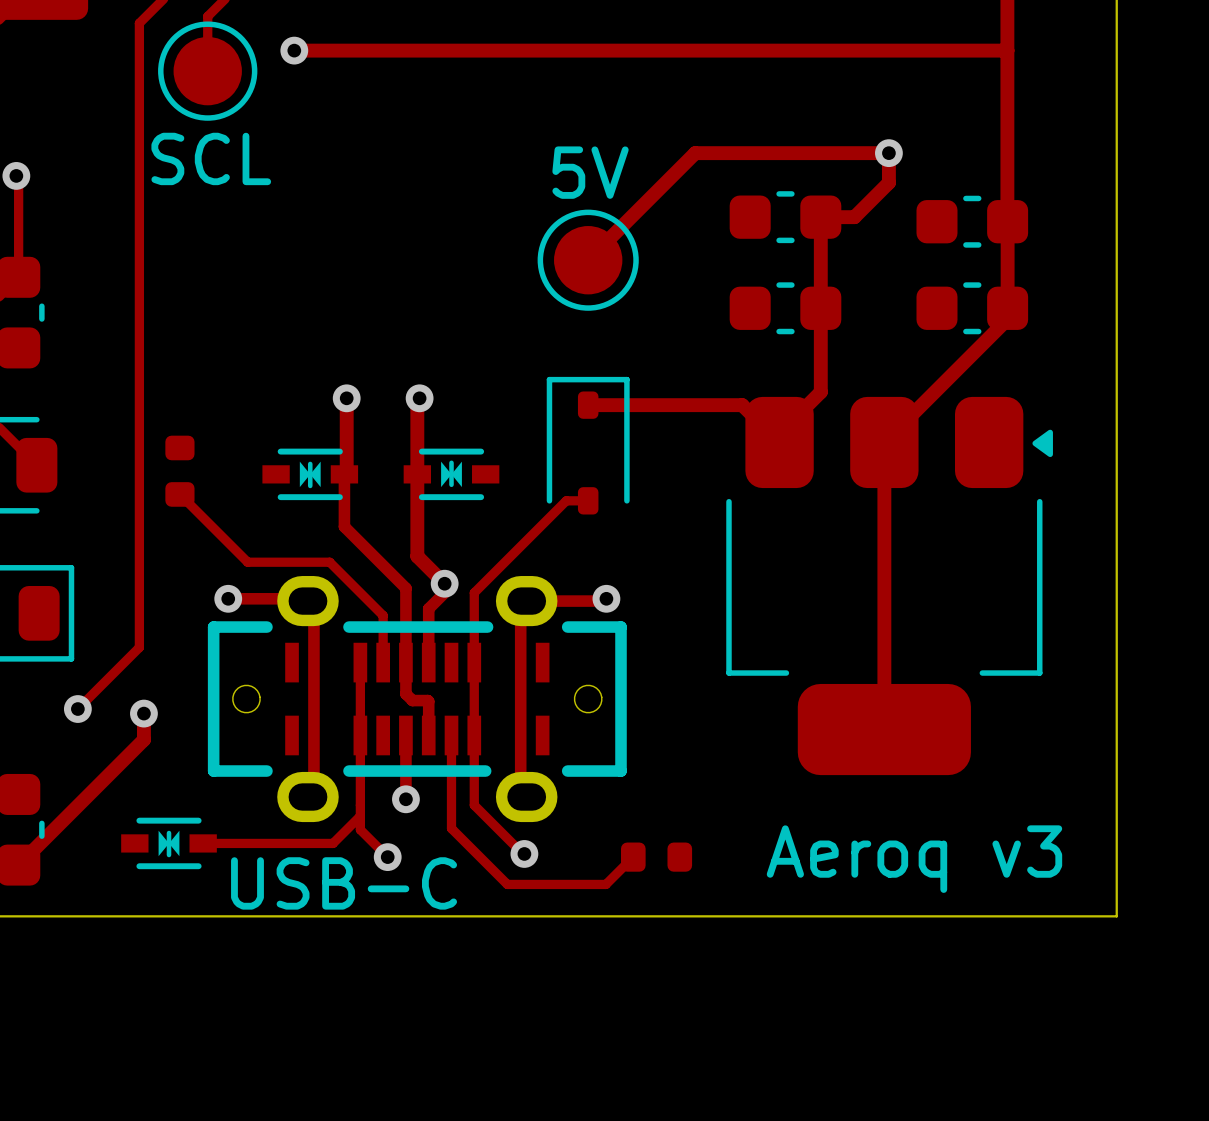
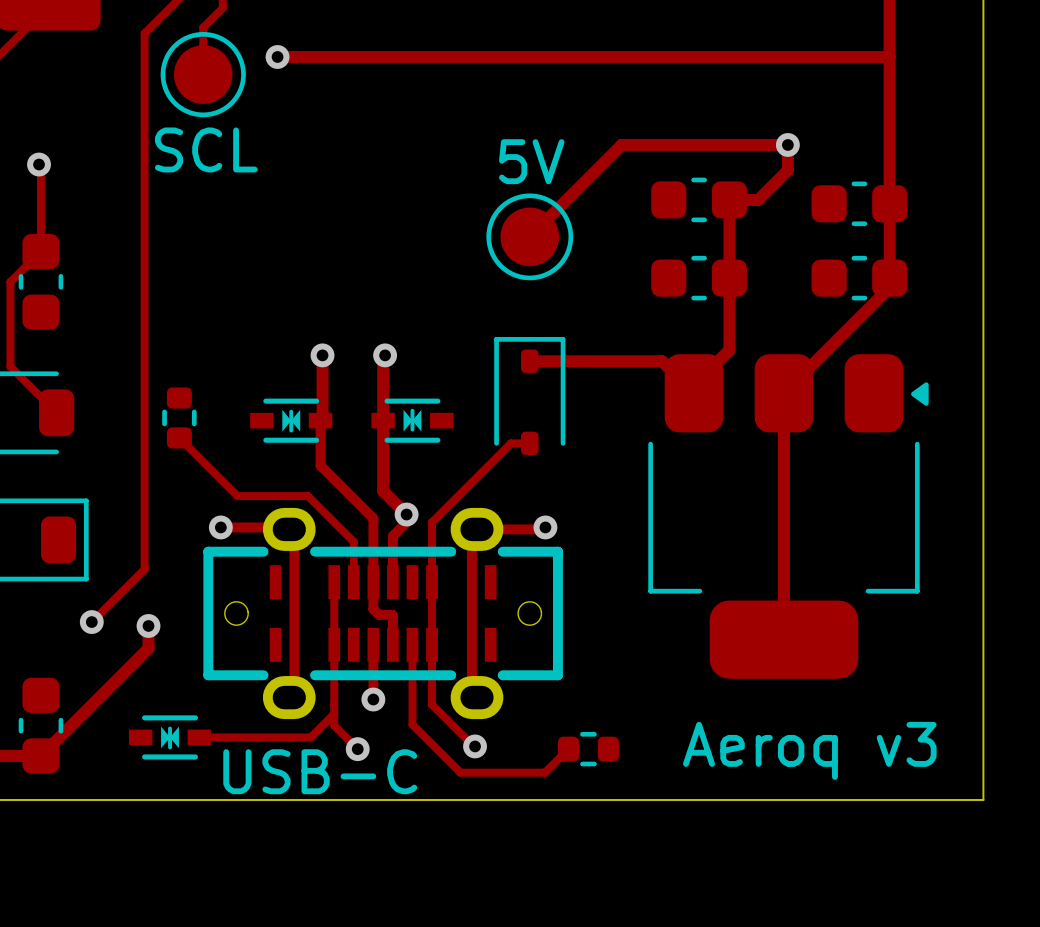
part footprint: [165, 435, 195, 507] -> [162, 387, 197, 449]
part footprint: [207, 576, 627, 823] -> [203, 507, 563, 720]
part footprint: [621, 842, 693, 872] -> [557, 731, 619, 767]

